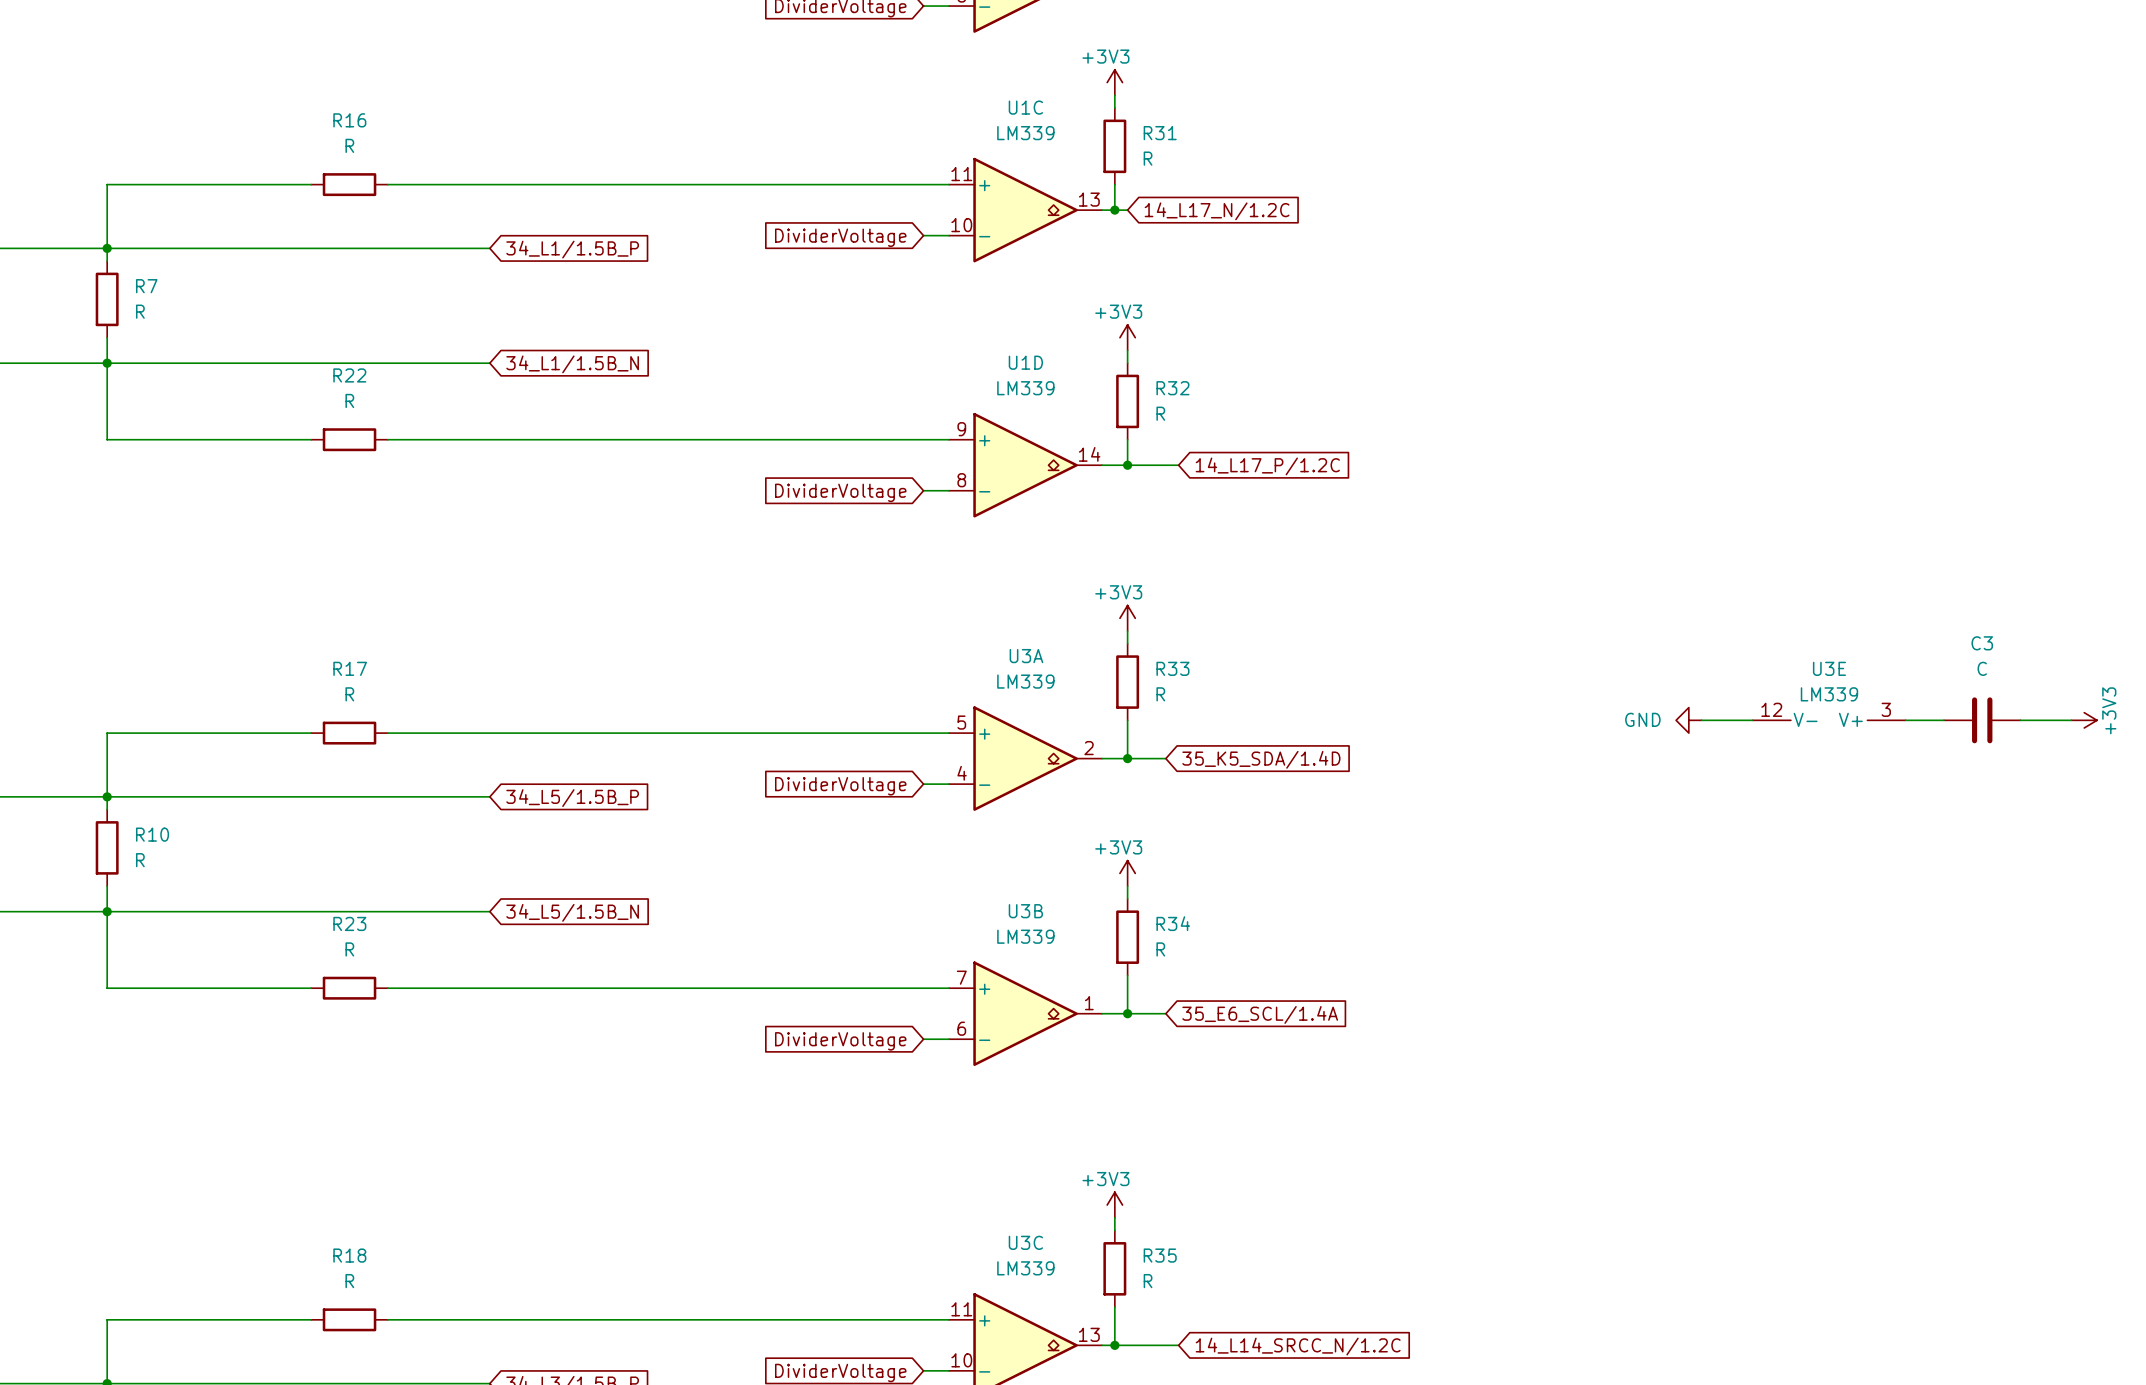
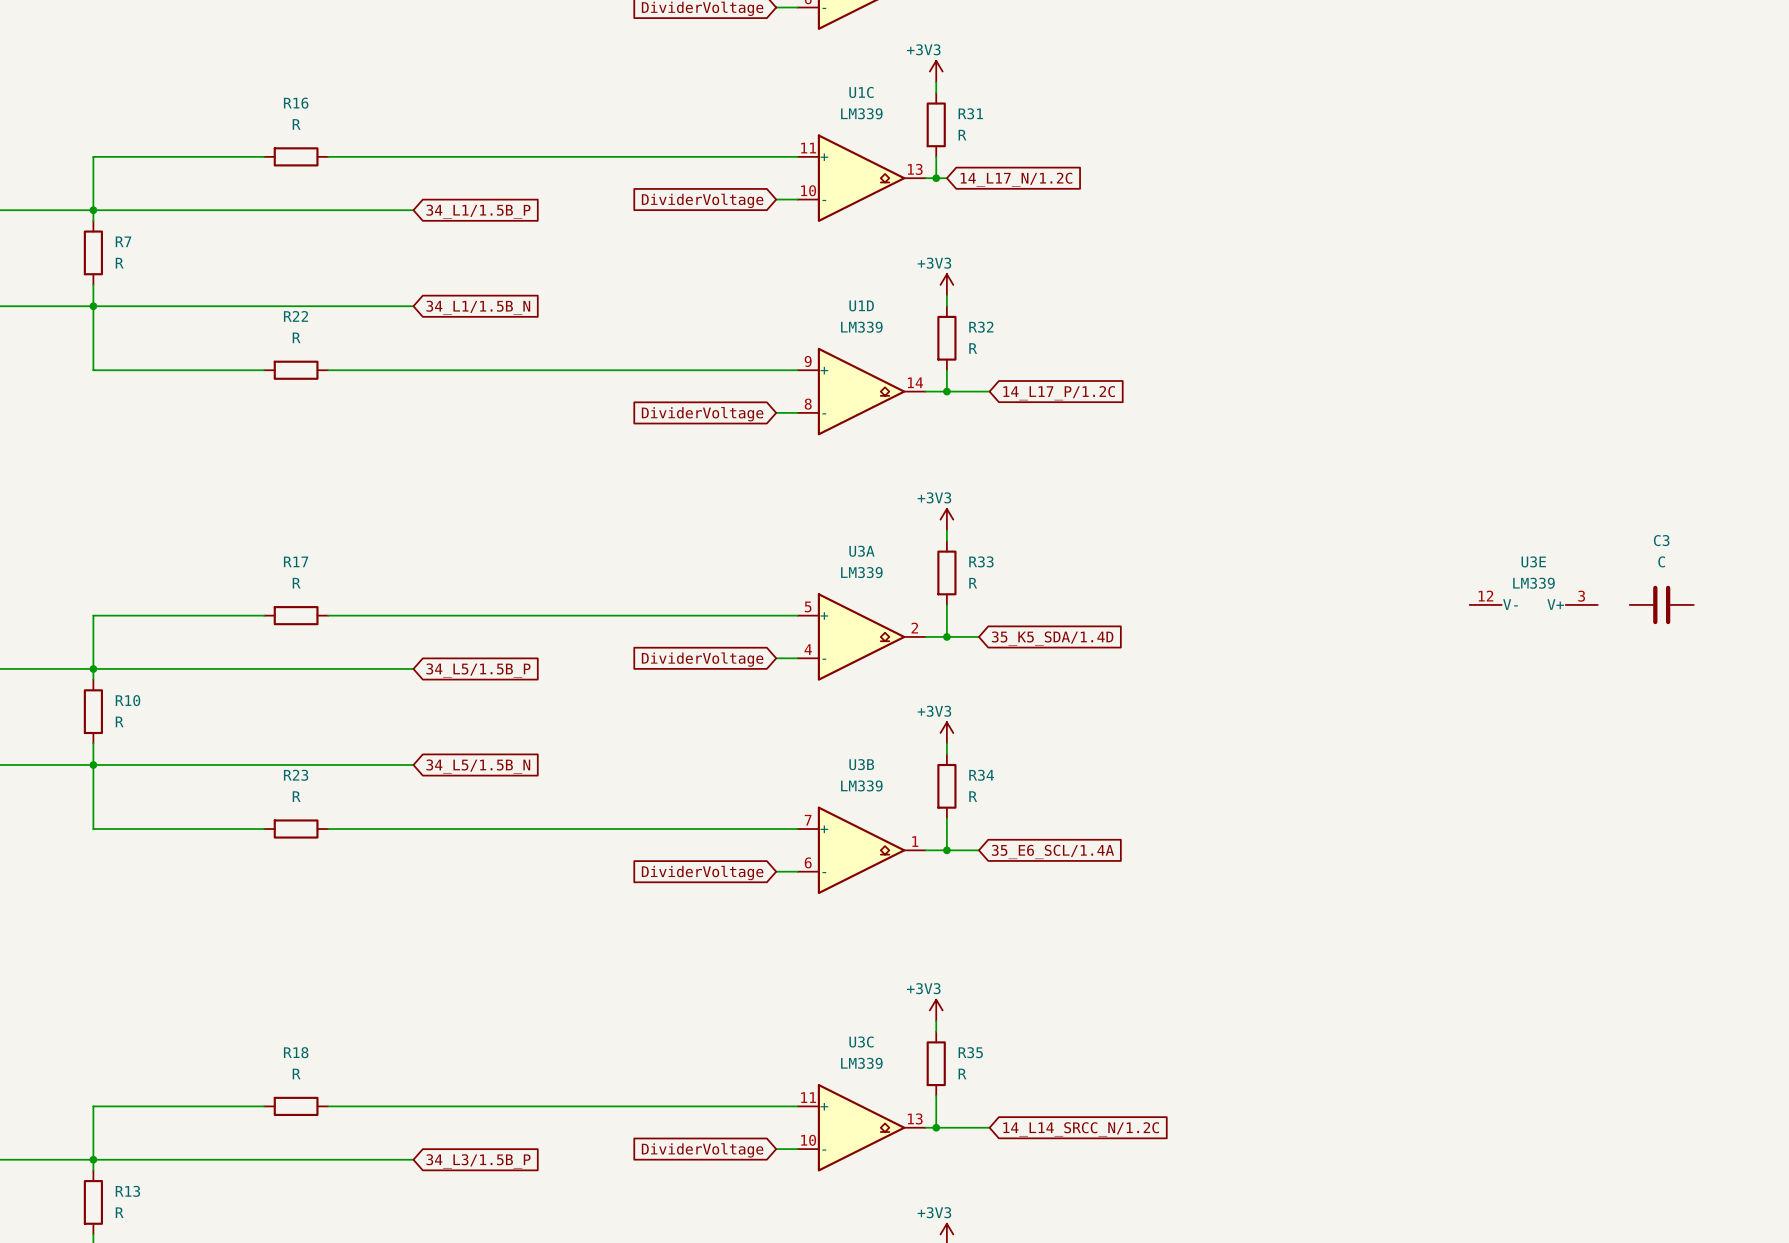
power symbol: GND (1688, 720) -> none
wire: (1701, 720) (1752, 720) -> none
wire: (1905, 720) (1943, 720) -> none
wire: (2020, 720) (2071, 720) -> none
power symbol: +3V3 (2084, 720) -> none

